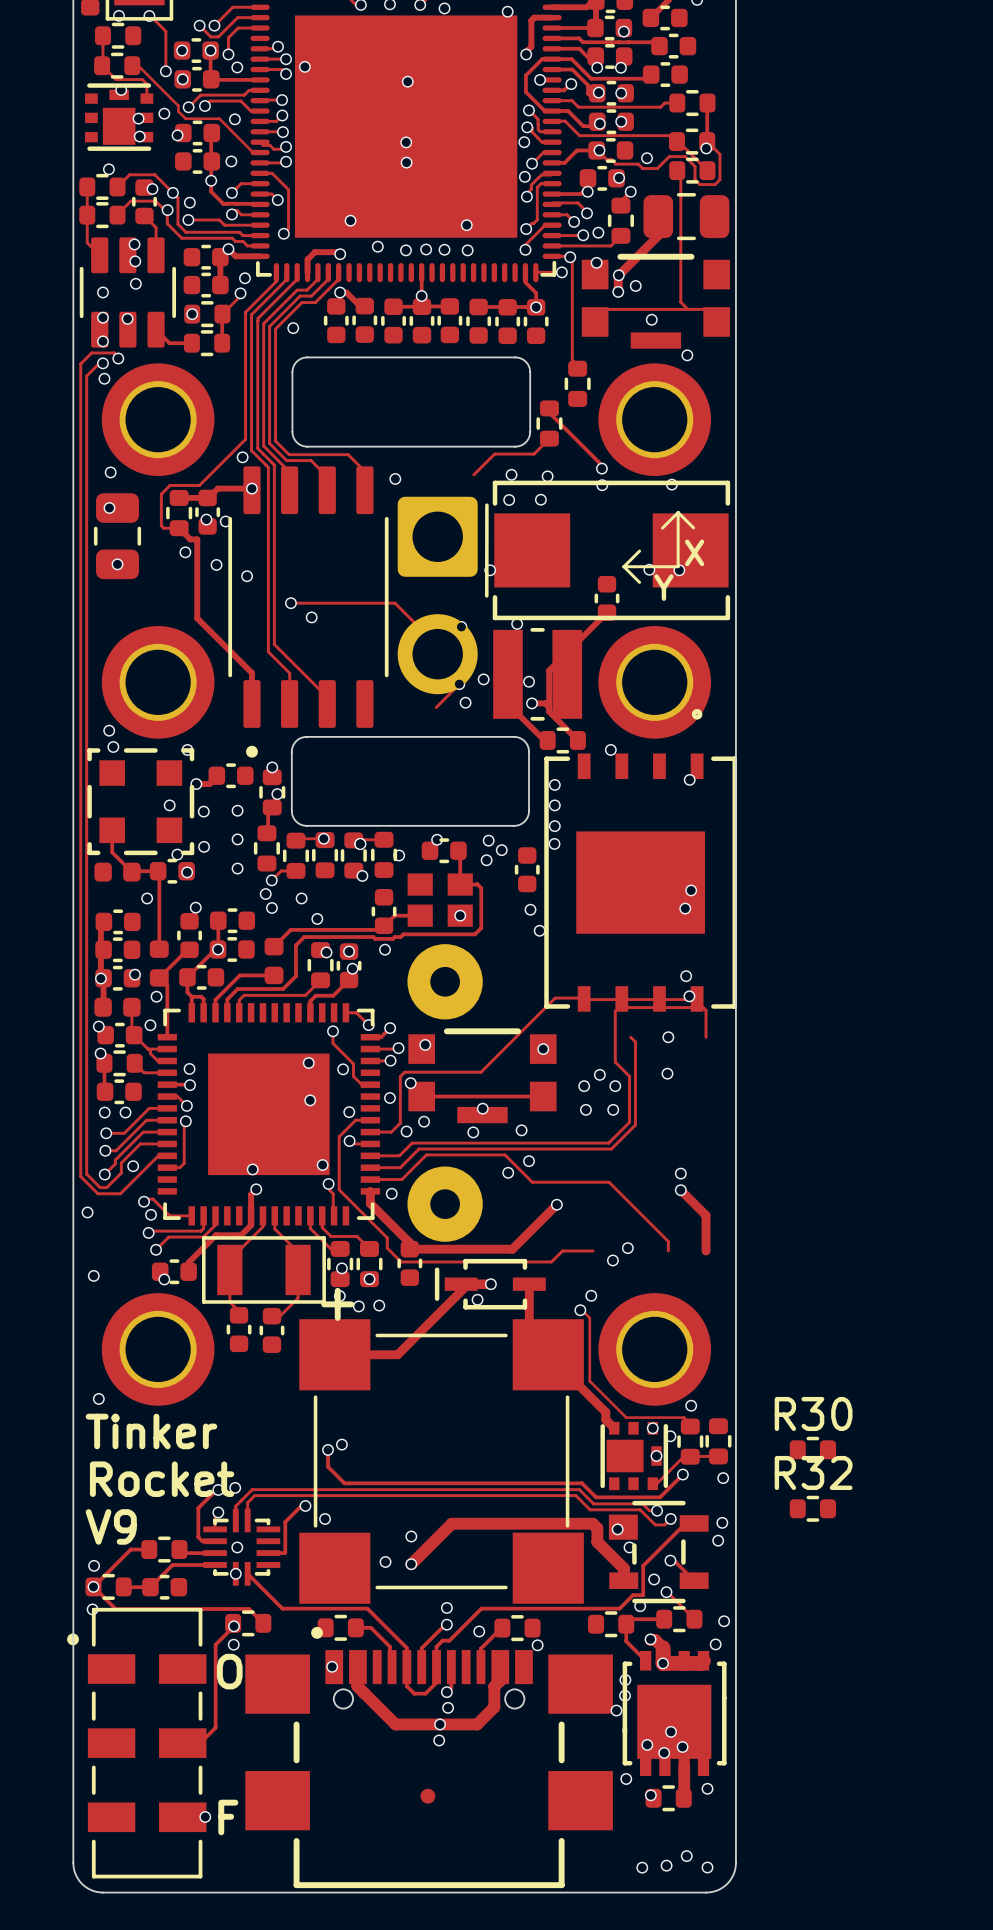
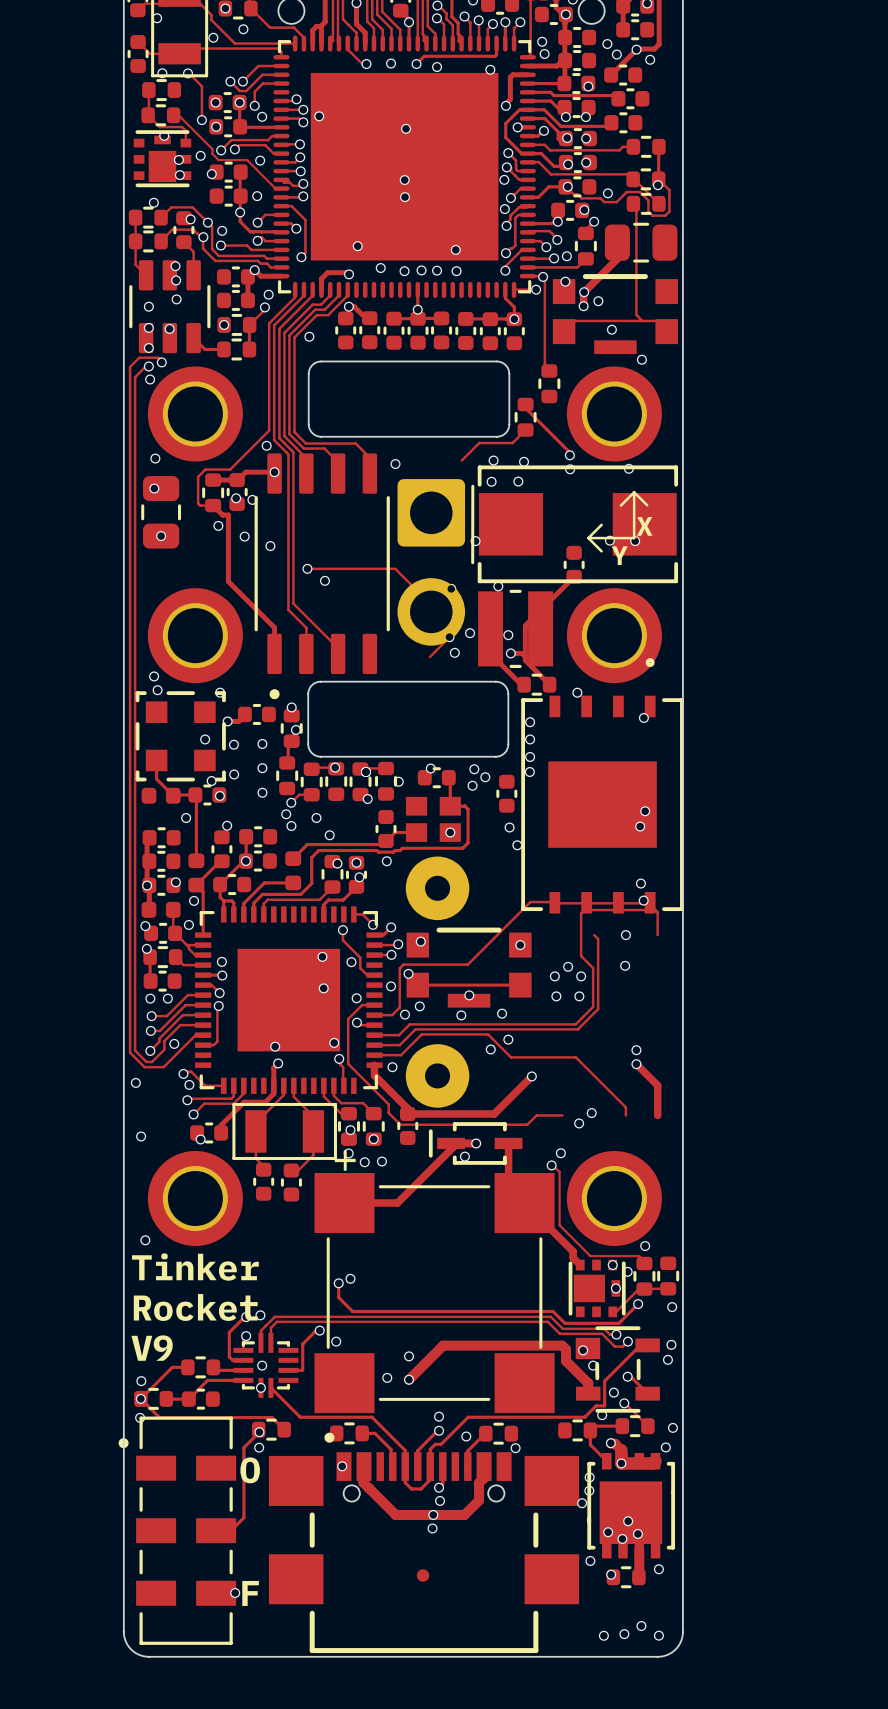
R30: (812, 1449) -> none
R32: (812, 1508) -> none

